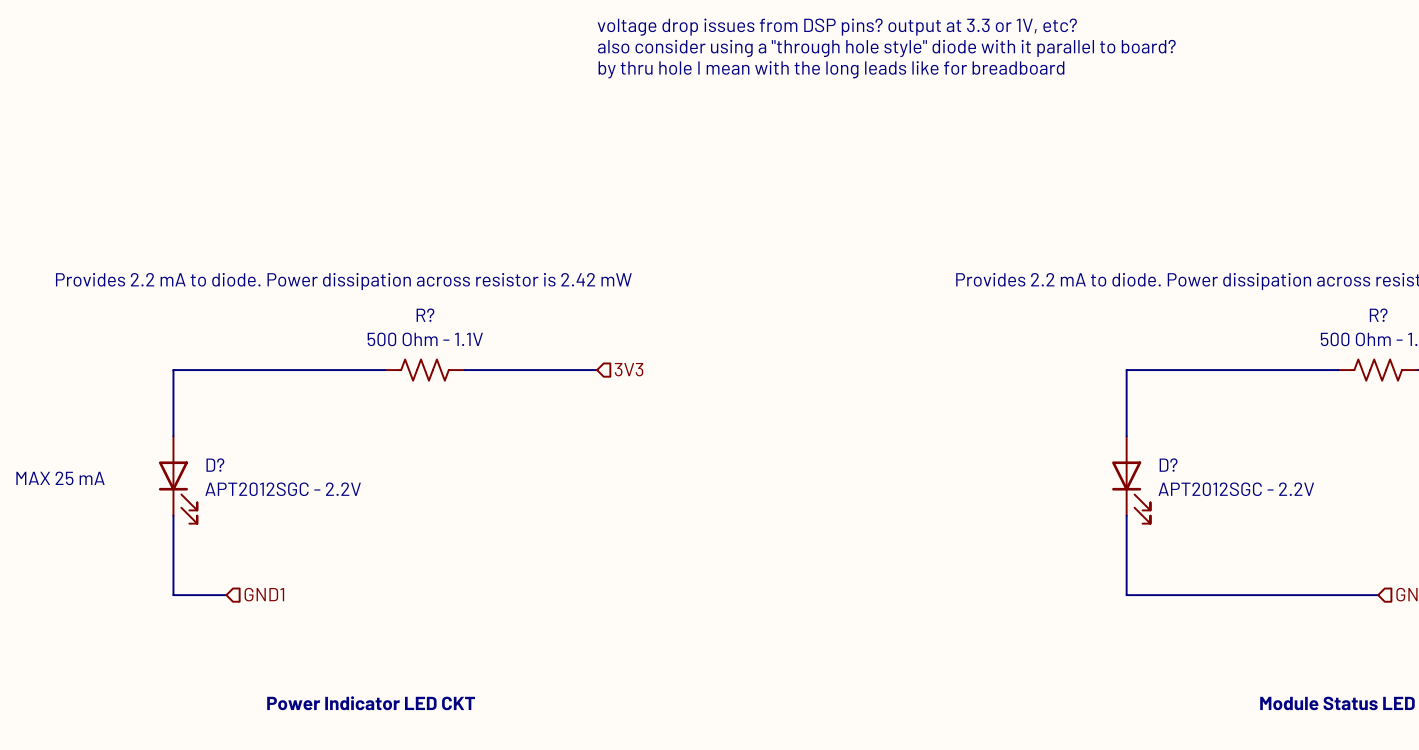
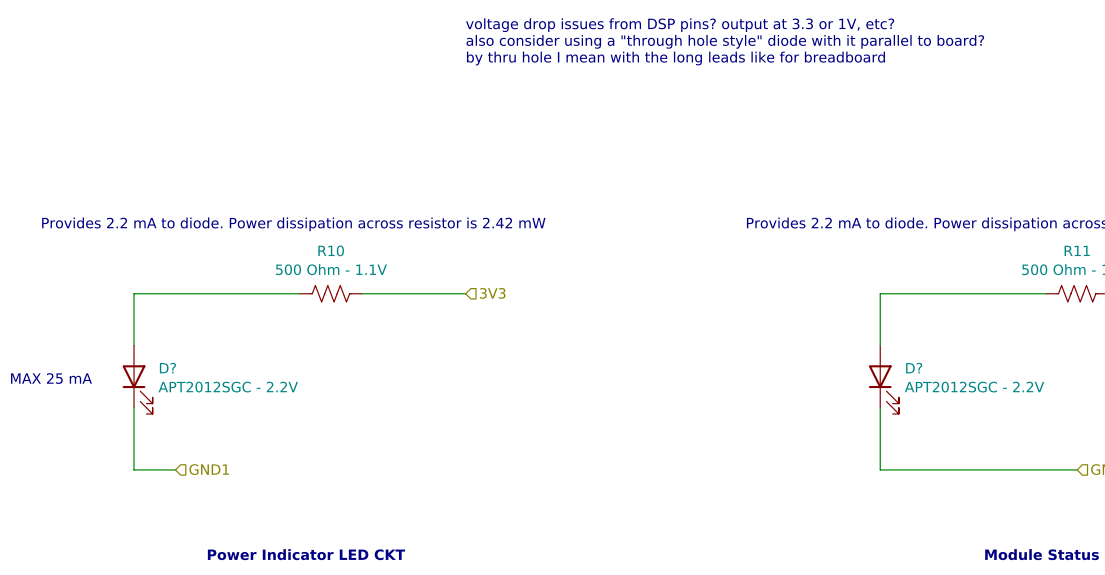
R? name: R? (425, 315) -> R10 (331, 250)
R? name: R? (1378, 315) -> R11 (1077, 250)

